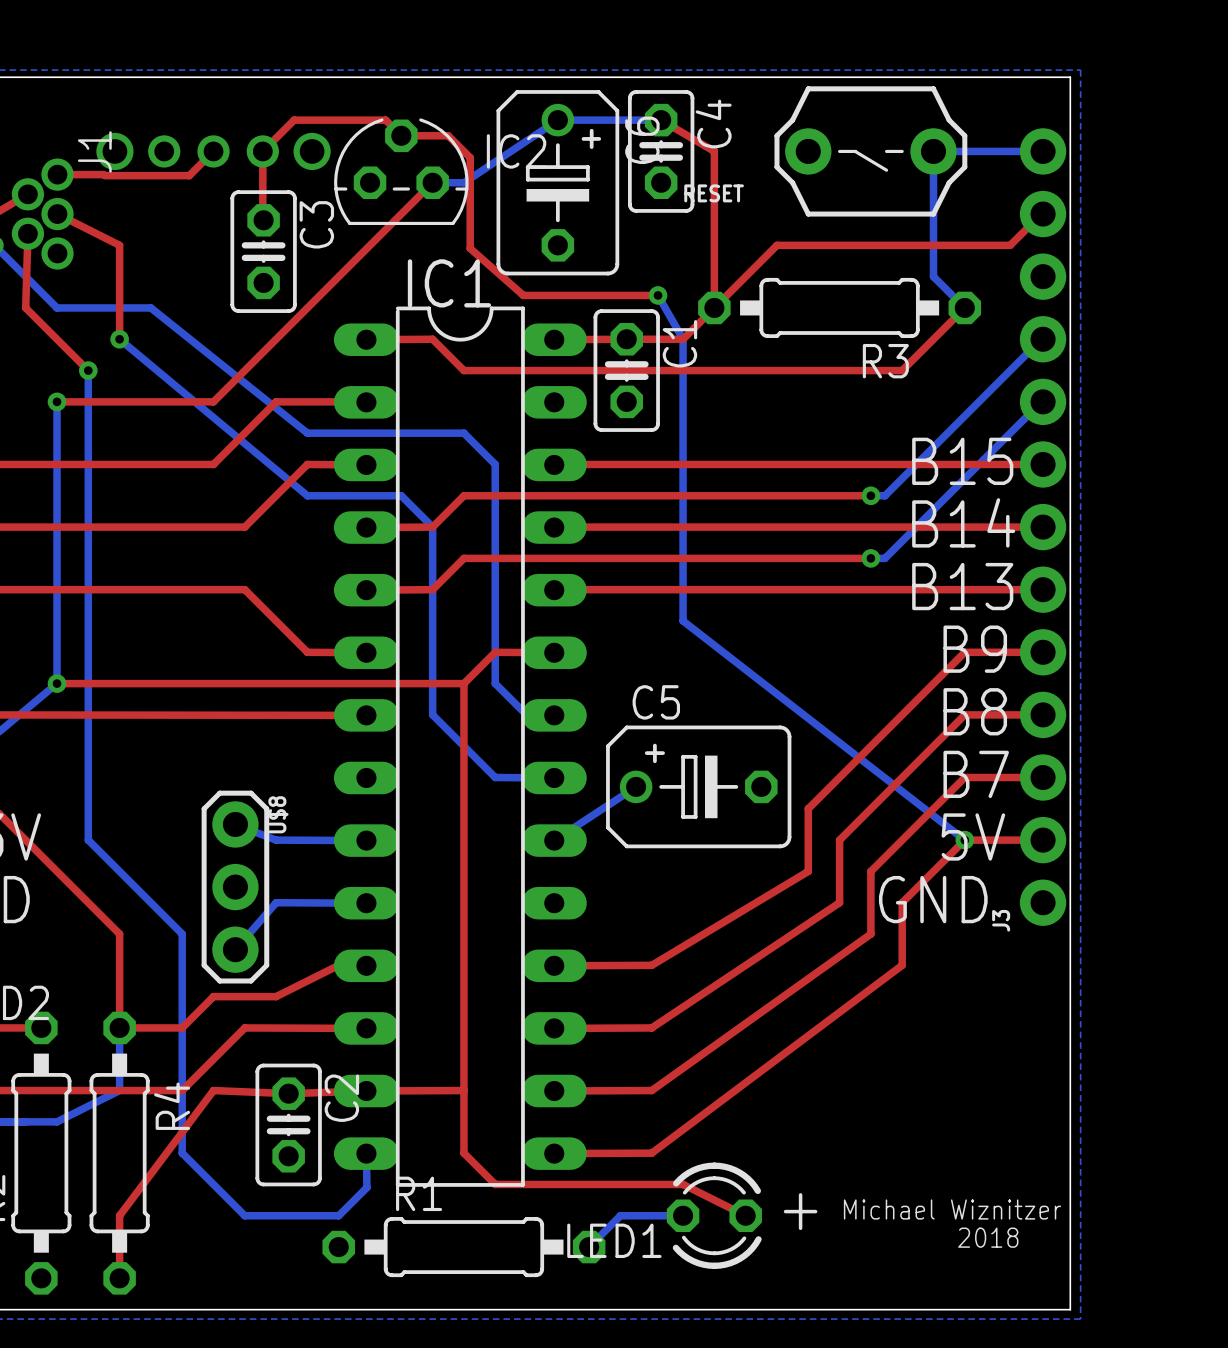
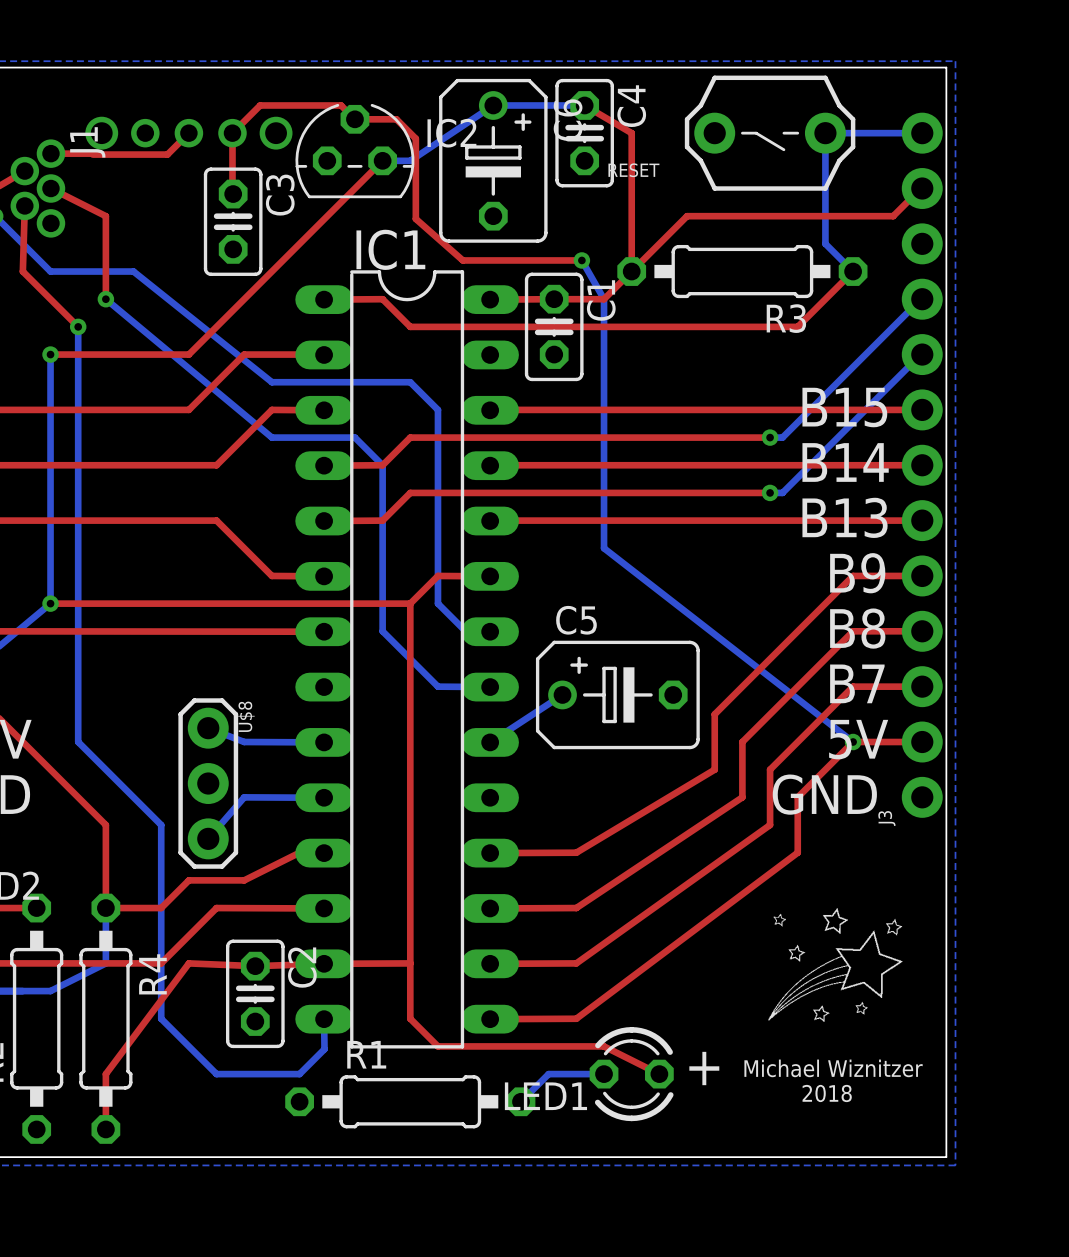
drawing: none -> [768, 908, 903, 1022]

